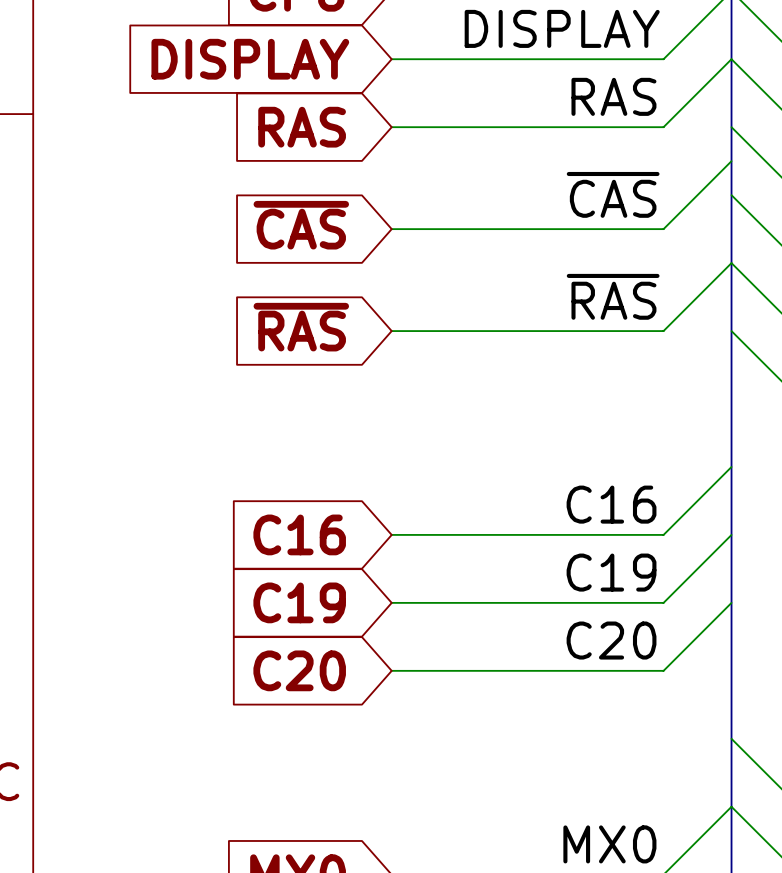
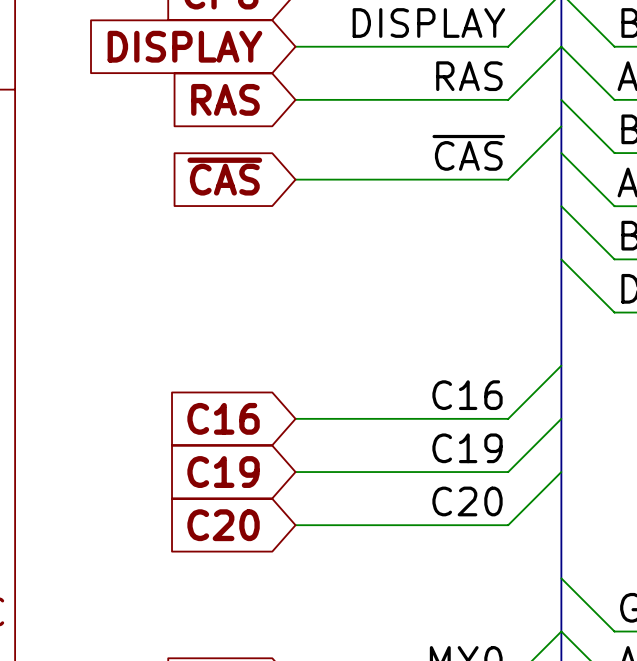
wire: (731, 263) (663, 331) (391, 331) -> none
label: ~{RAS} (613, 296) -> none
global label: ~{RAS} (301, 327) -> none

